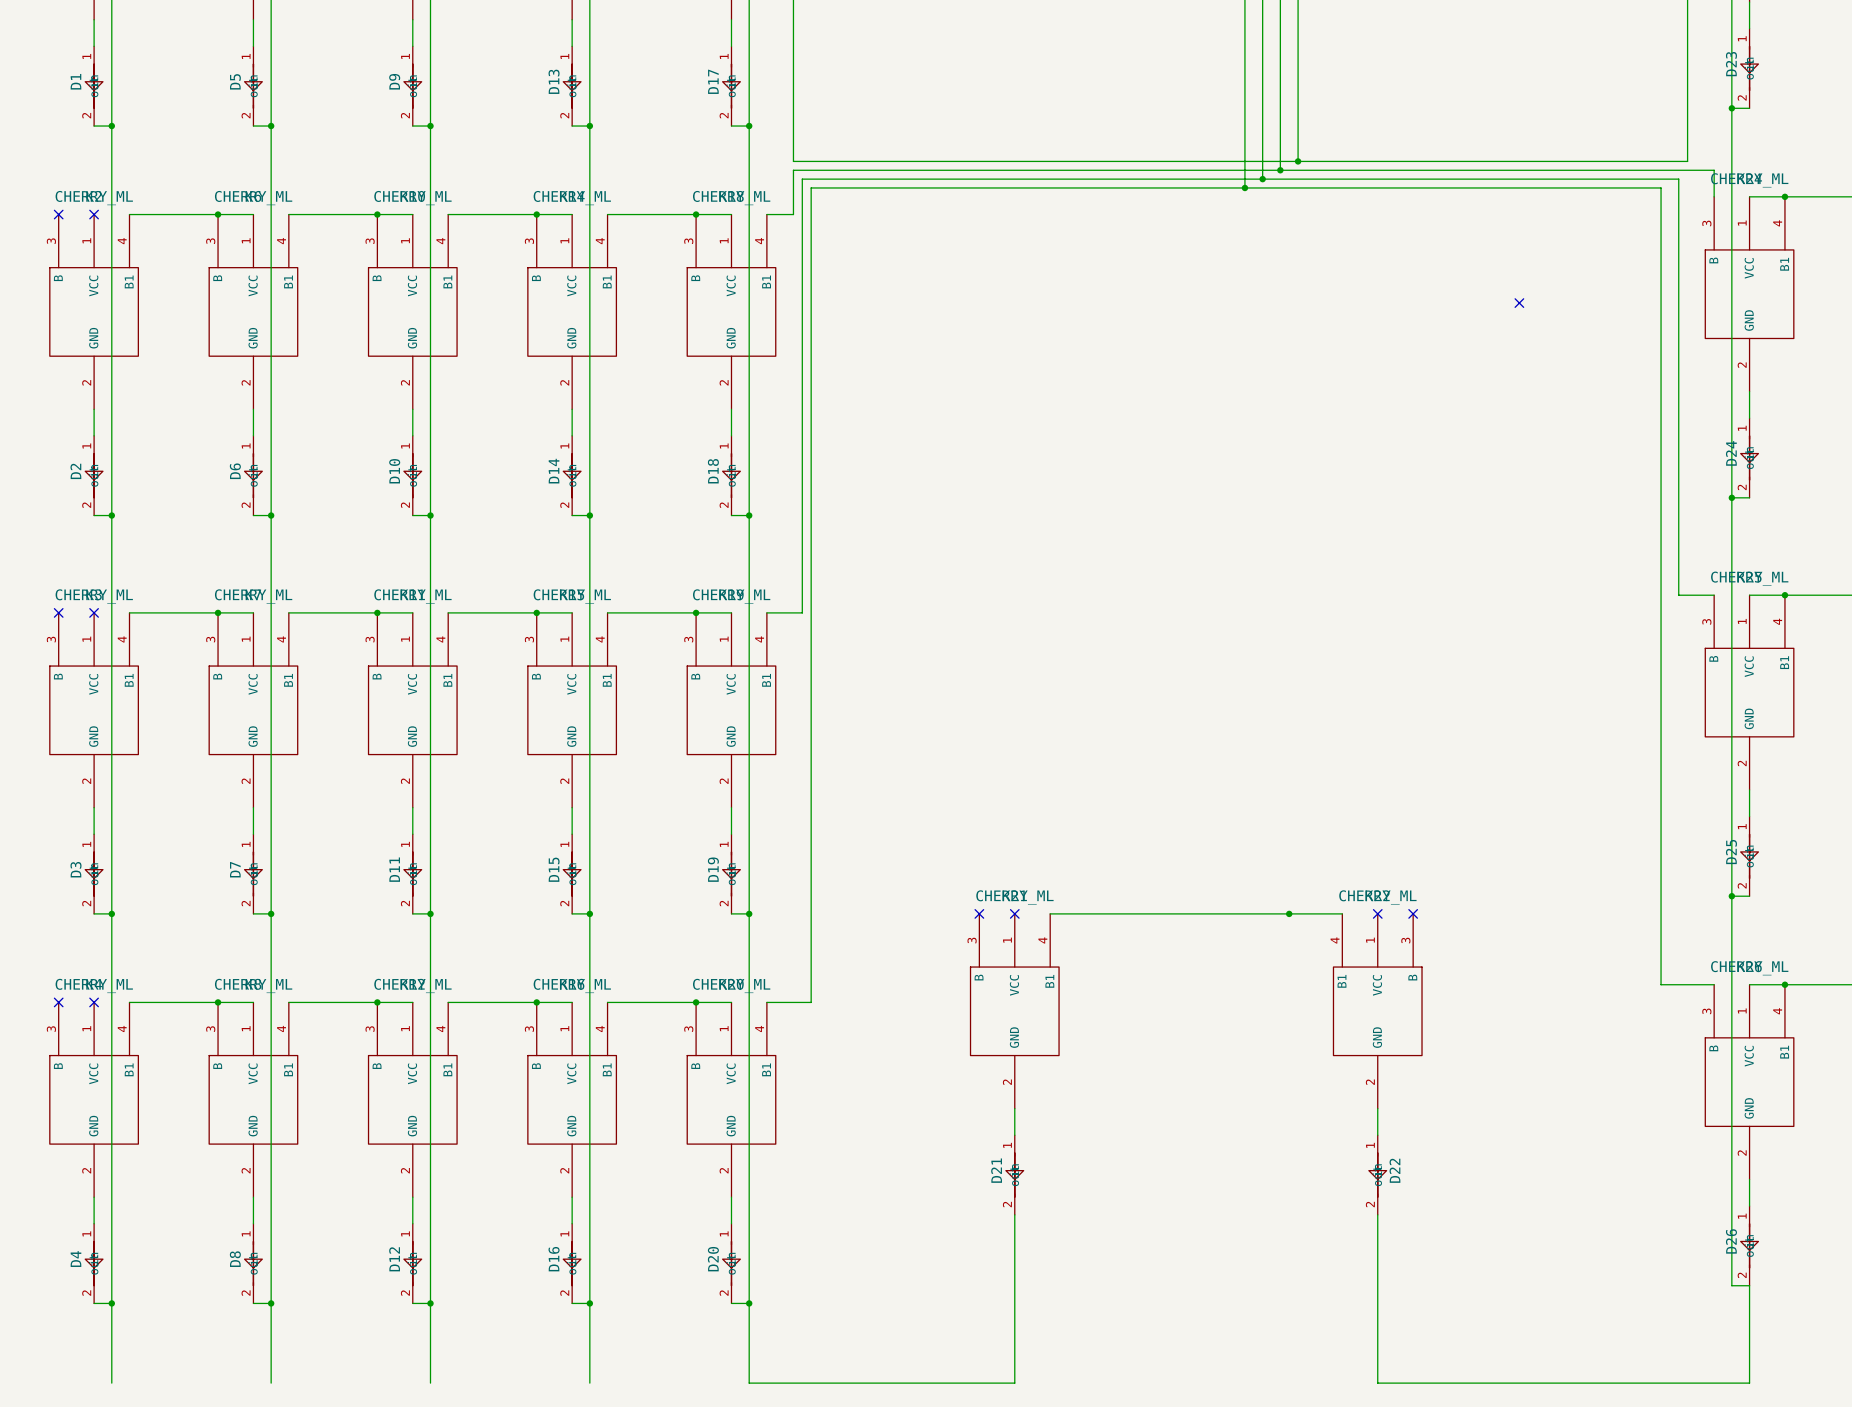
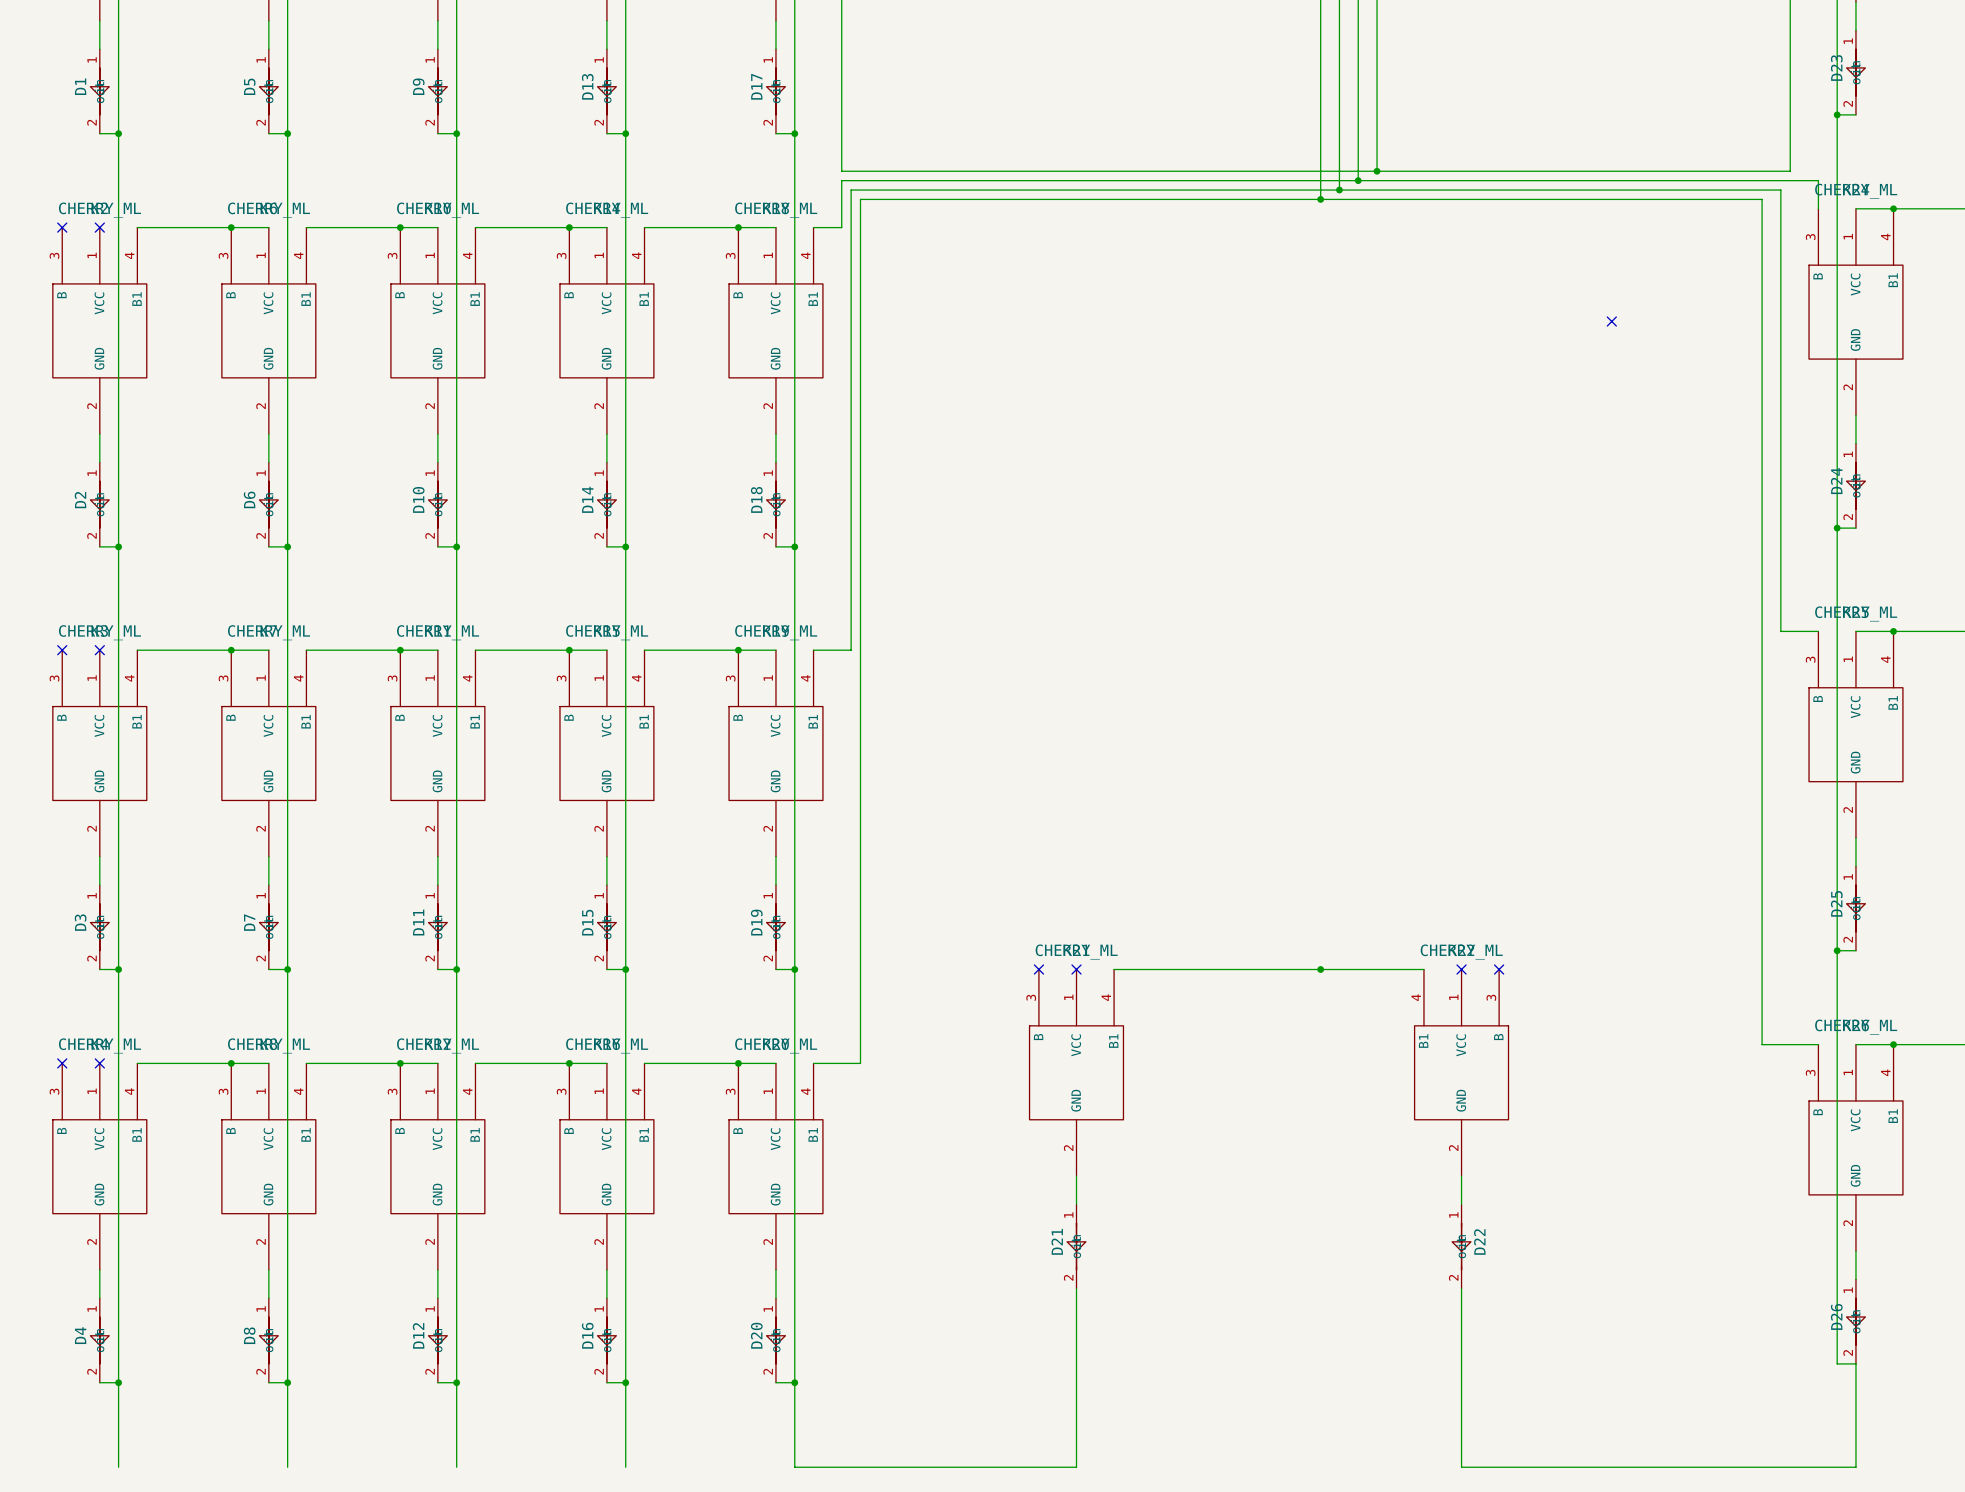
junction: none -> (1320, 969)
junction: (1289, 913) -> none

